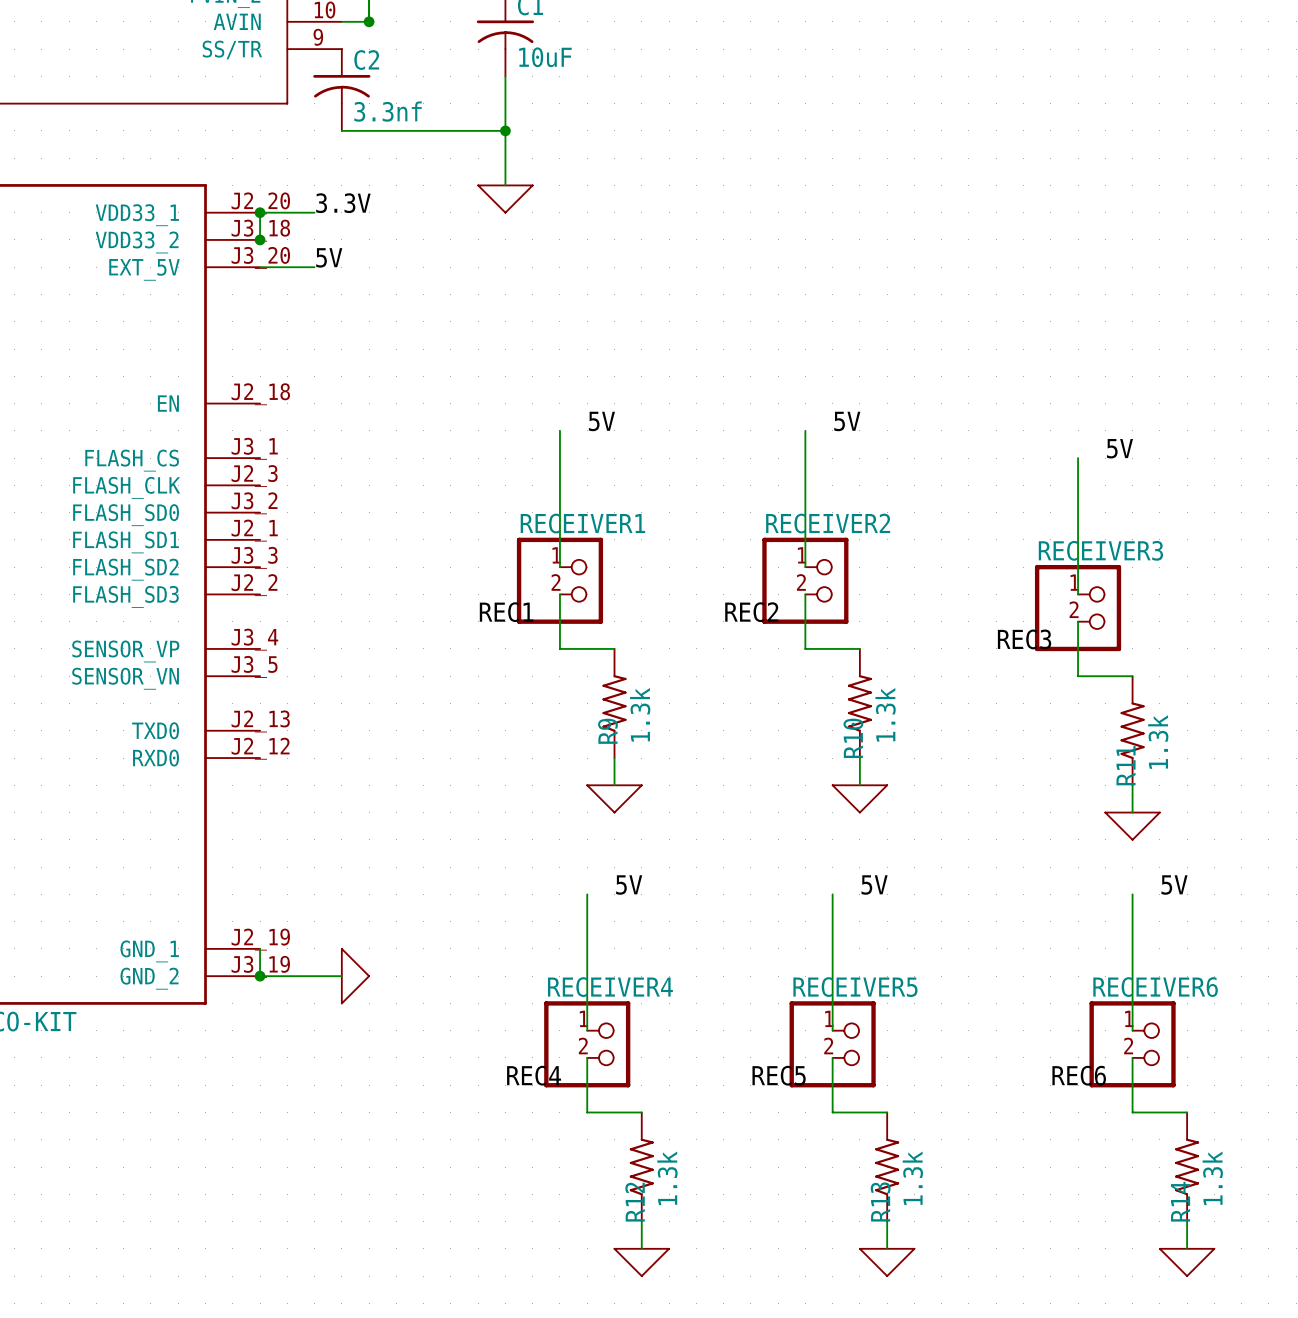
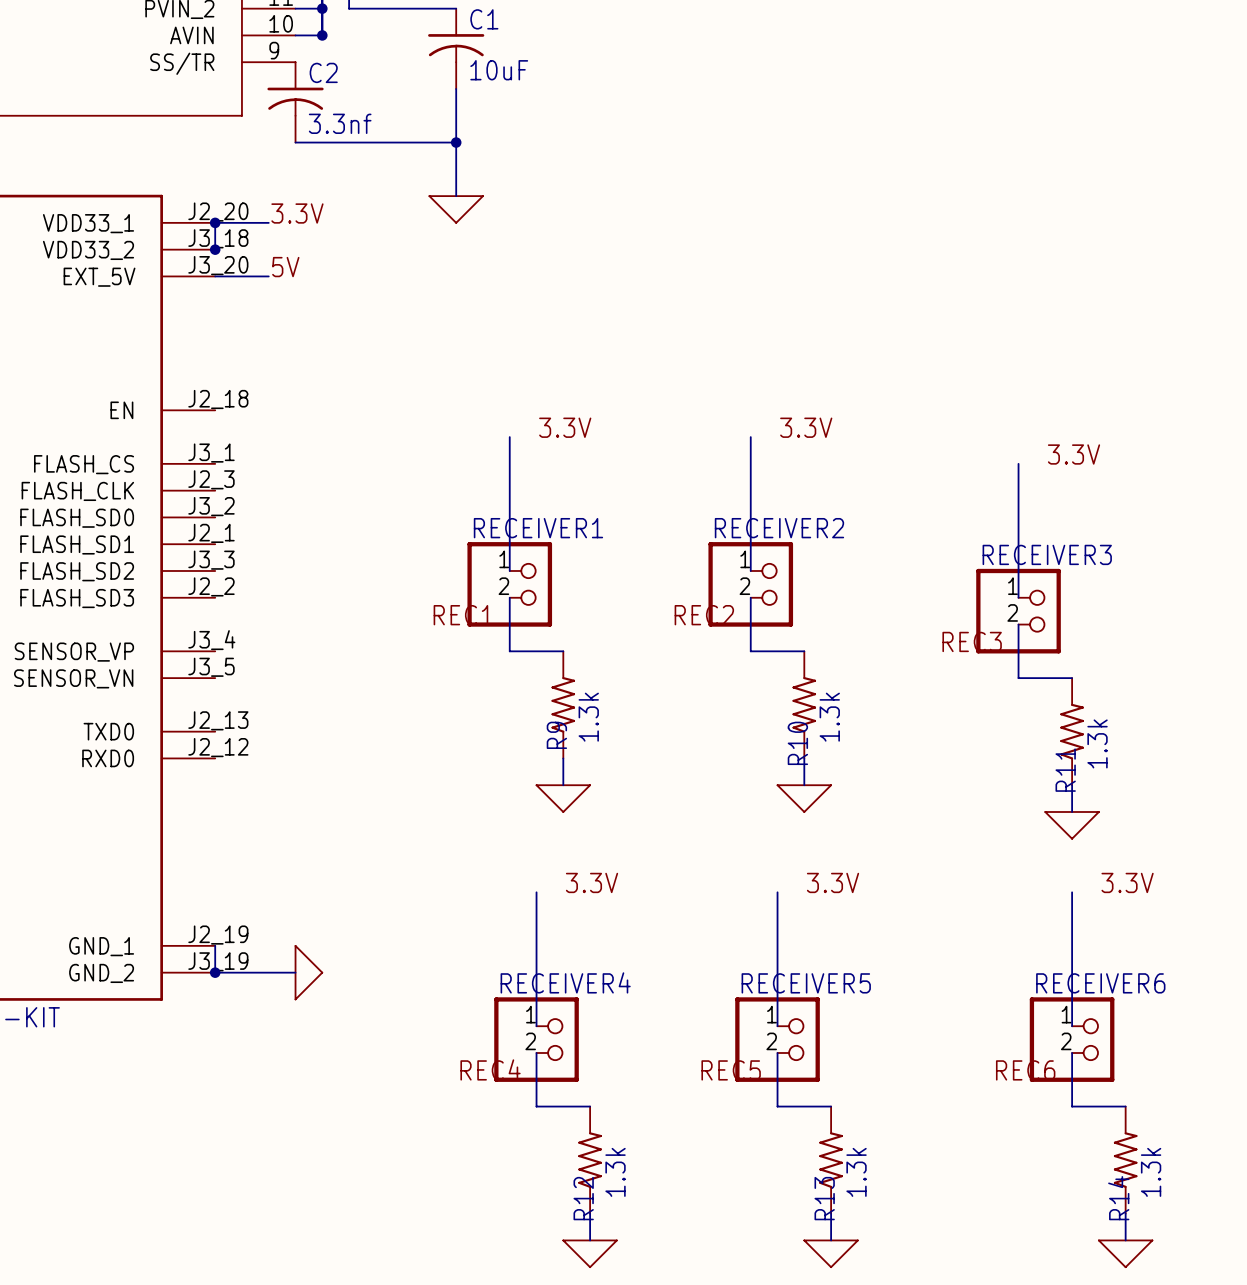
label: 5V (601, 421) -> 3.3V (565, 427)
label: 5V (847, 421) -> 3.3V (806, 427)
label: 5V (1119, 448) -> 3.3V (1074, 454)
label: 5V (629, 885) -> 3.3V (592, 882)
label: 5V (874, 885) -> 3.3V (833, 882)
label: 5V (1174, 885) -> 3.3V (1127, 882)

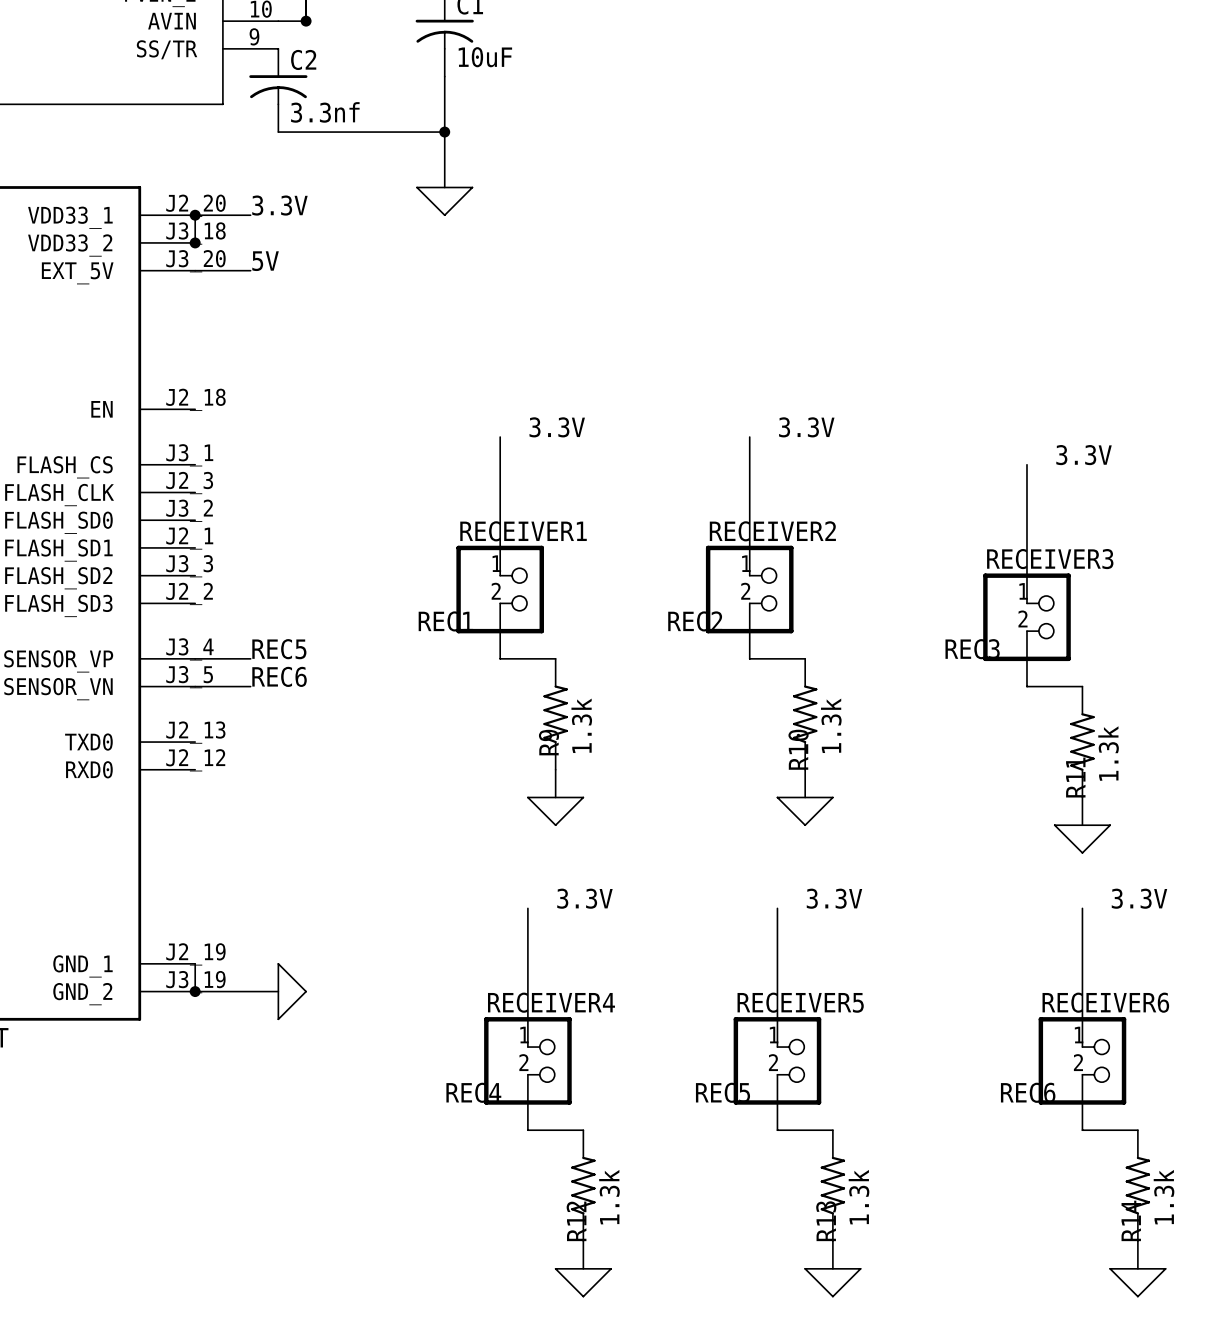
label: none -> REC5 (279, 649)
wire: none -> (195, 658) (250, 658)
label: none -> REC6 (279, 676)
wire: none -> (195, 686) (250, 686)

